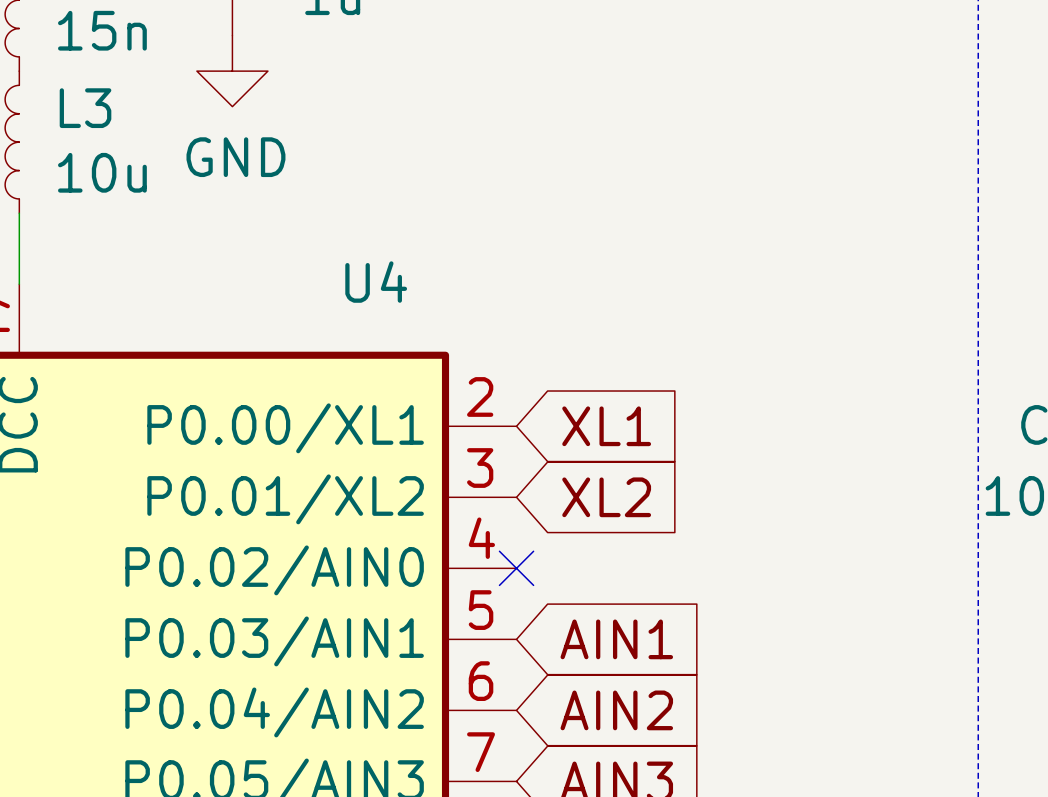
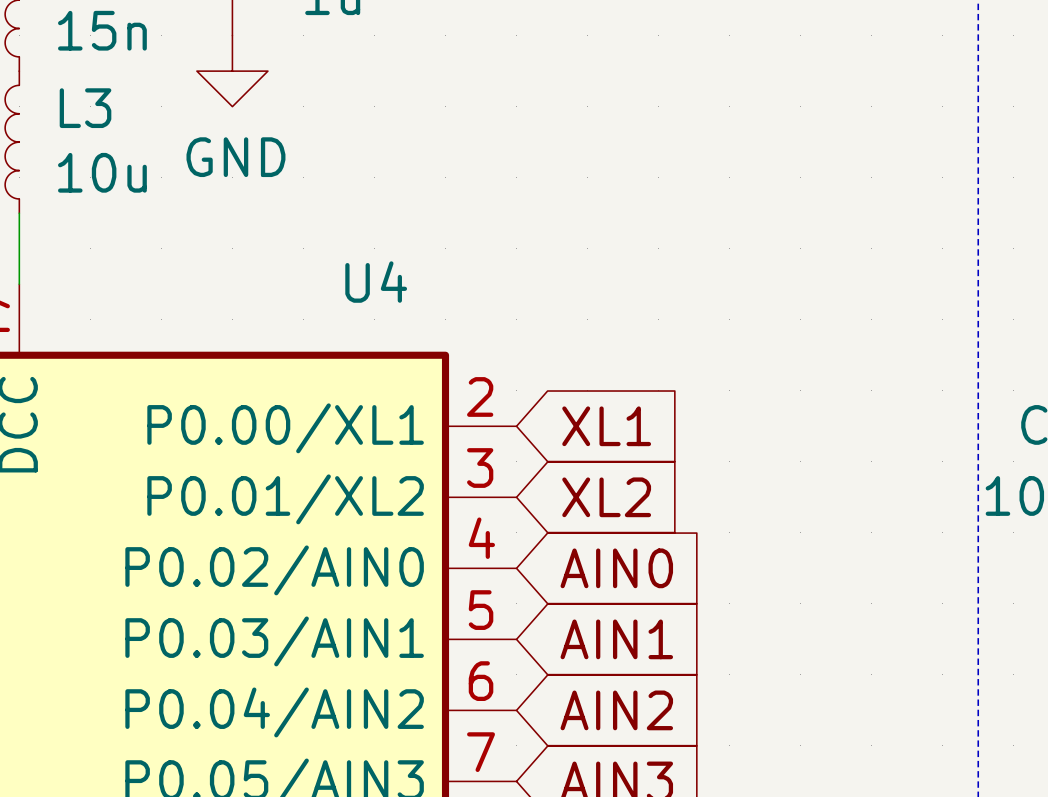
no-connect mark: (516, 568) -> none
global label: none -> AIN0 (616, 568)

